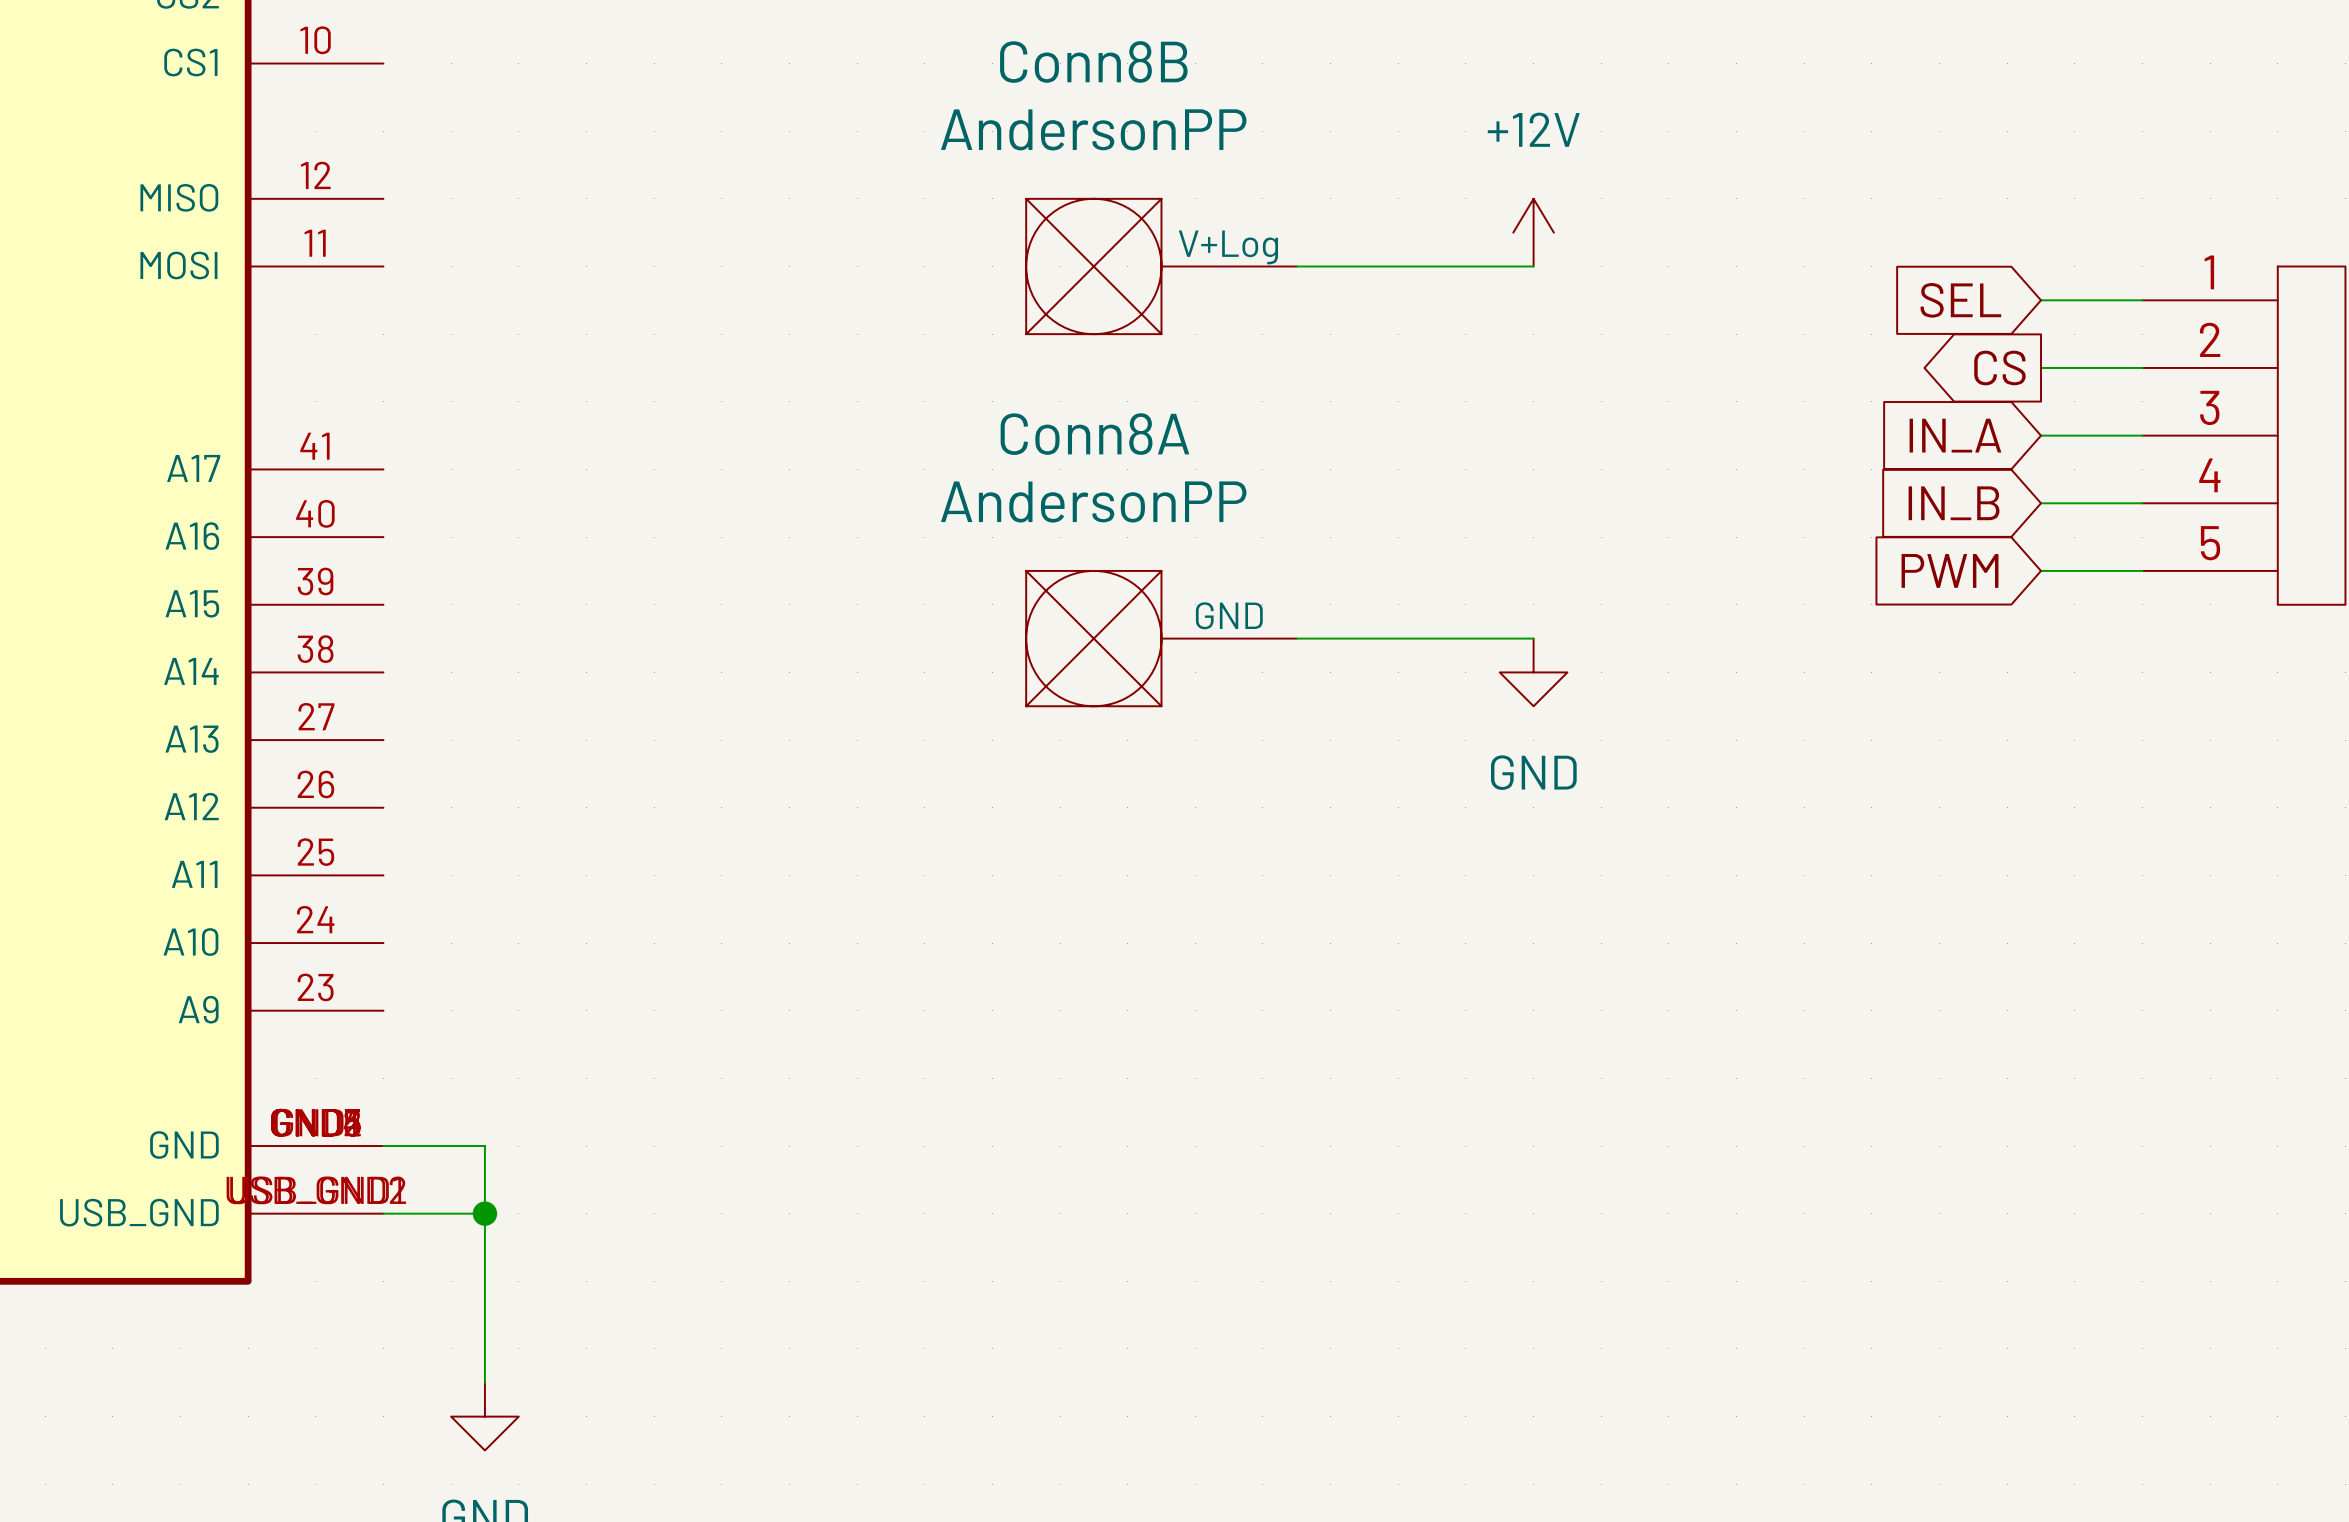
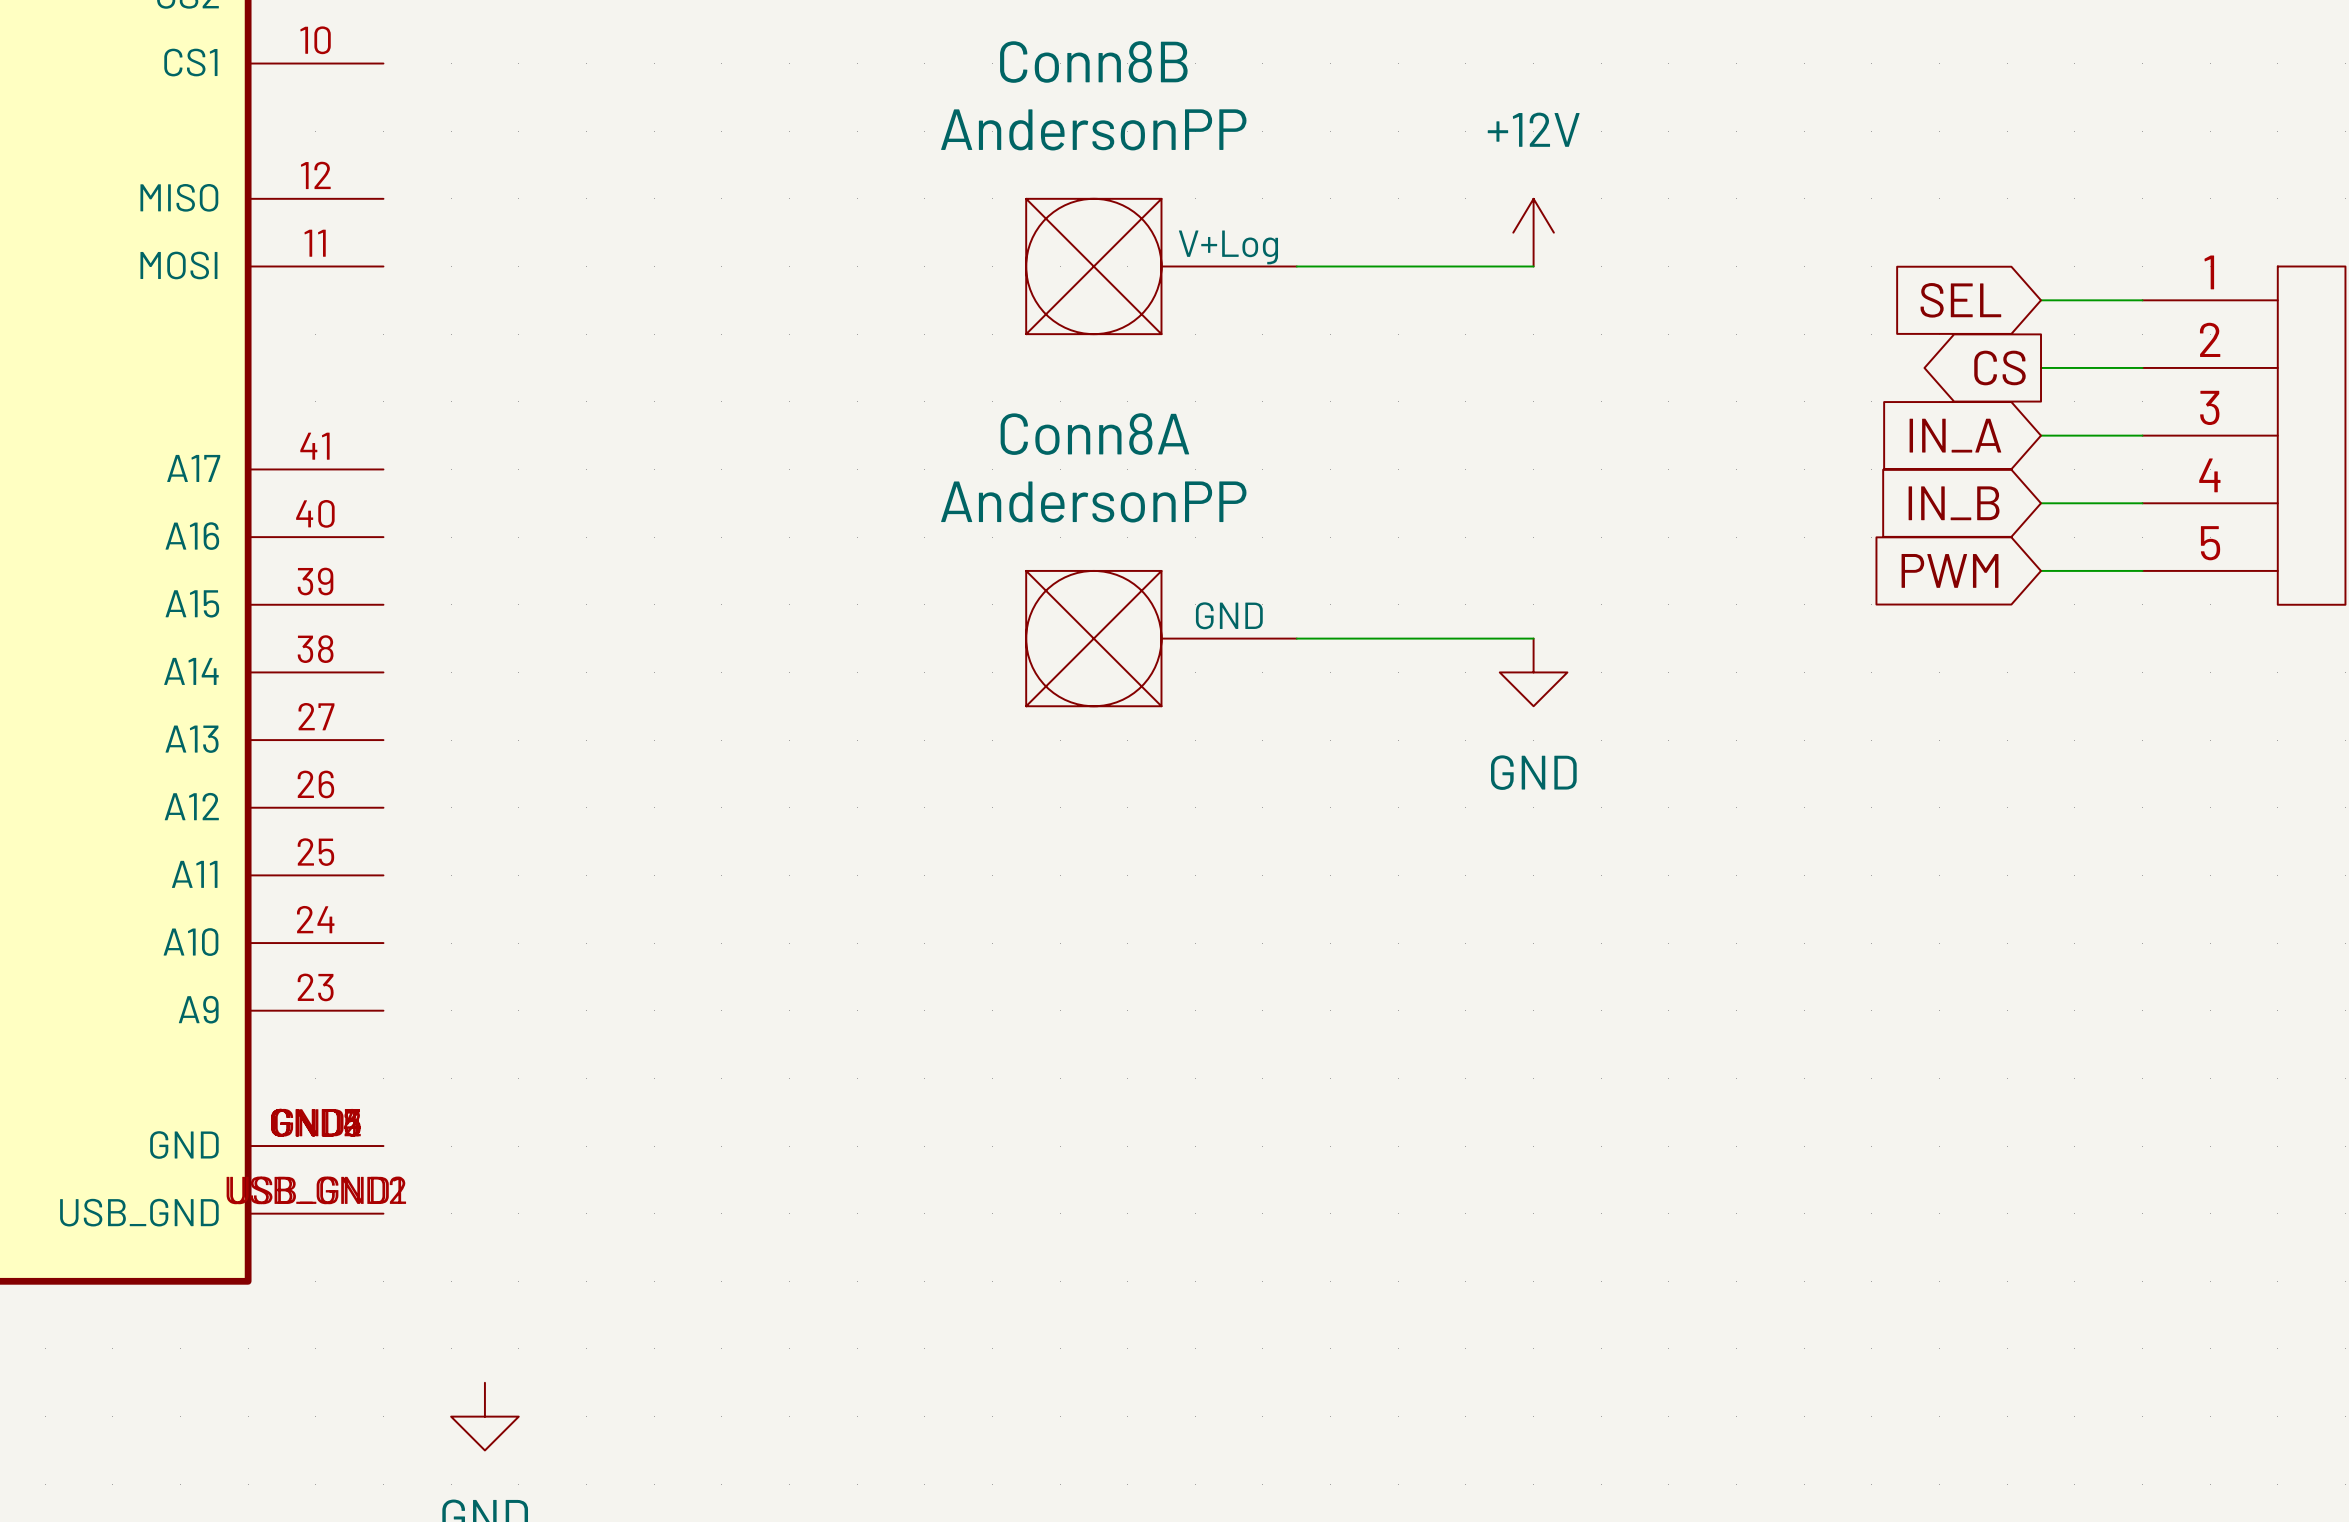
wire: (383, 1146) (484, 1146) (484, 1382) -> none
wire: (383, 1213) (484, 1213) -> none
junction: (484, 1213) -> none

